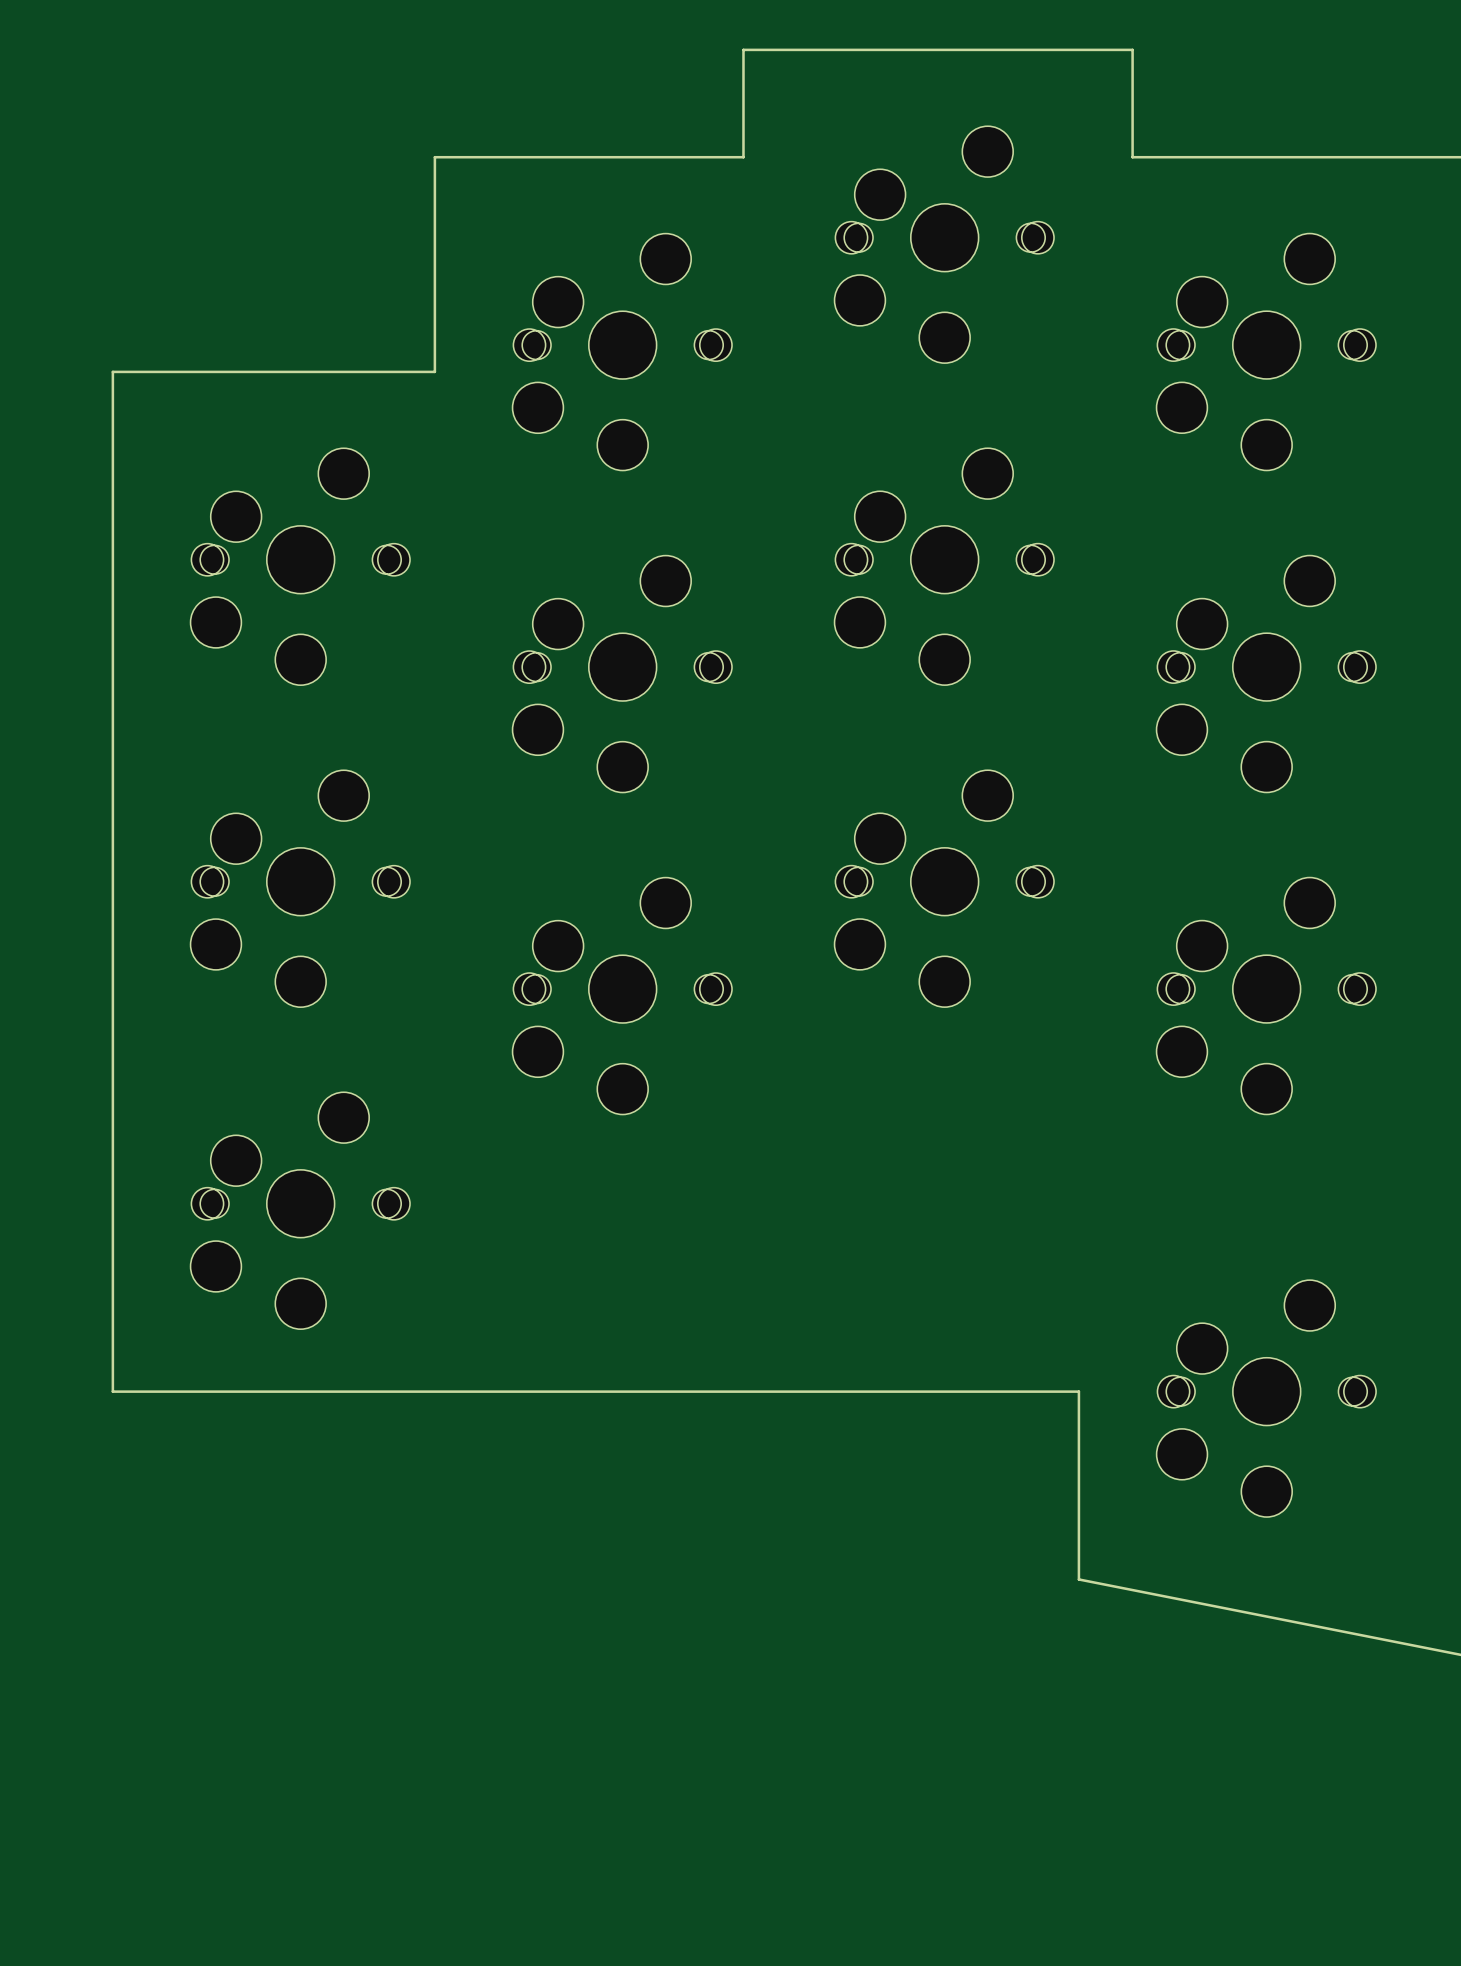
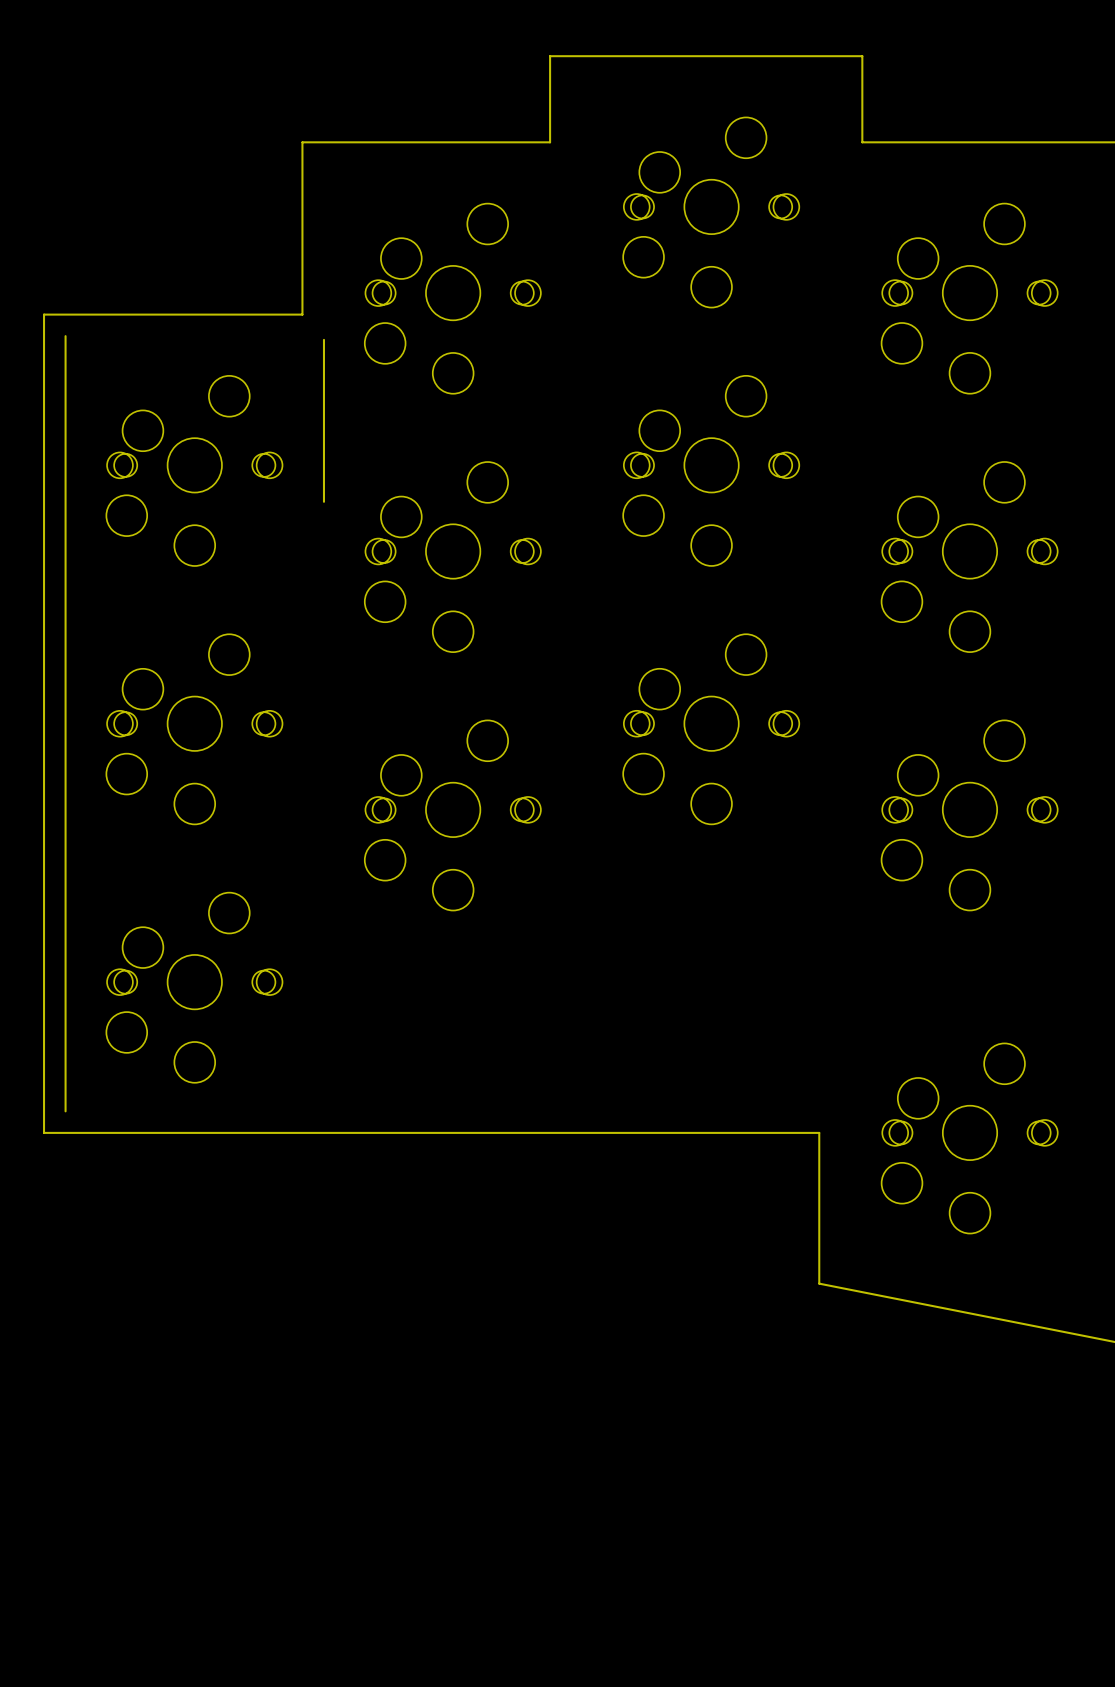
board edge: none -> (65, 336) (65, 1111)
board edge: none -> (323, 339) (323, 501)

